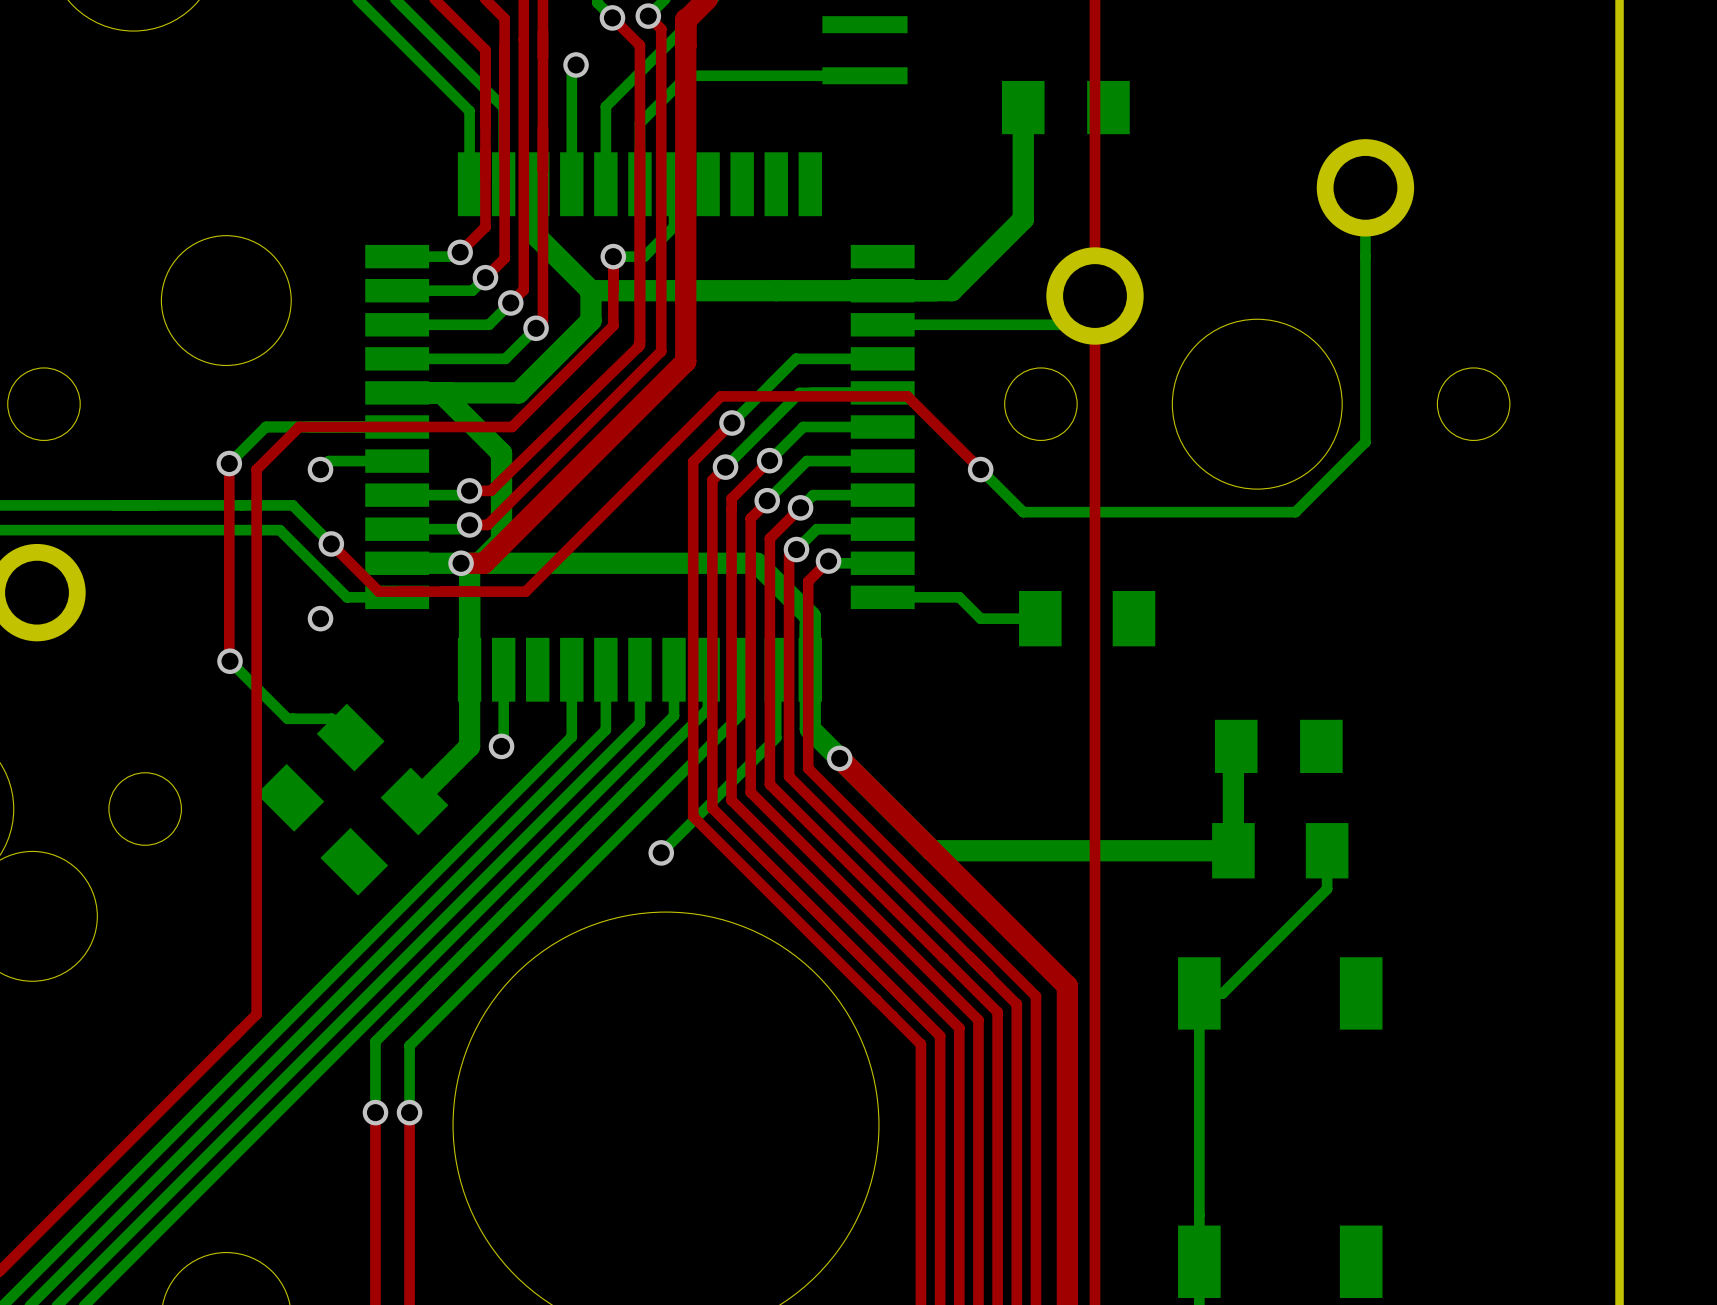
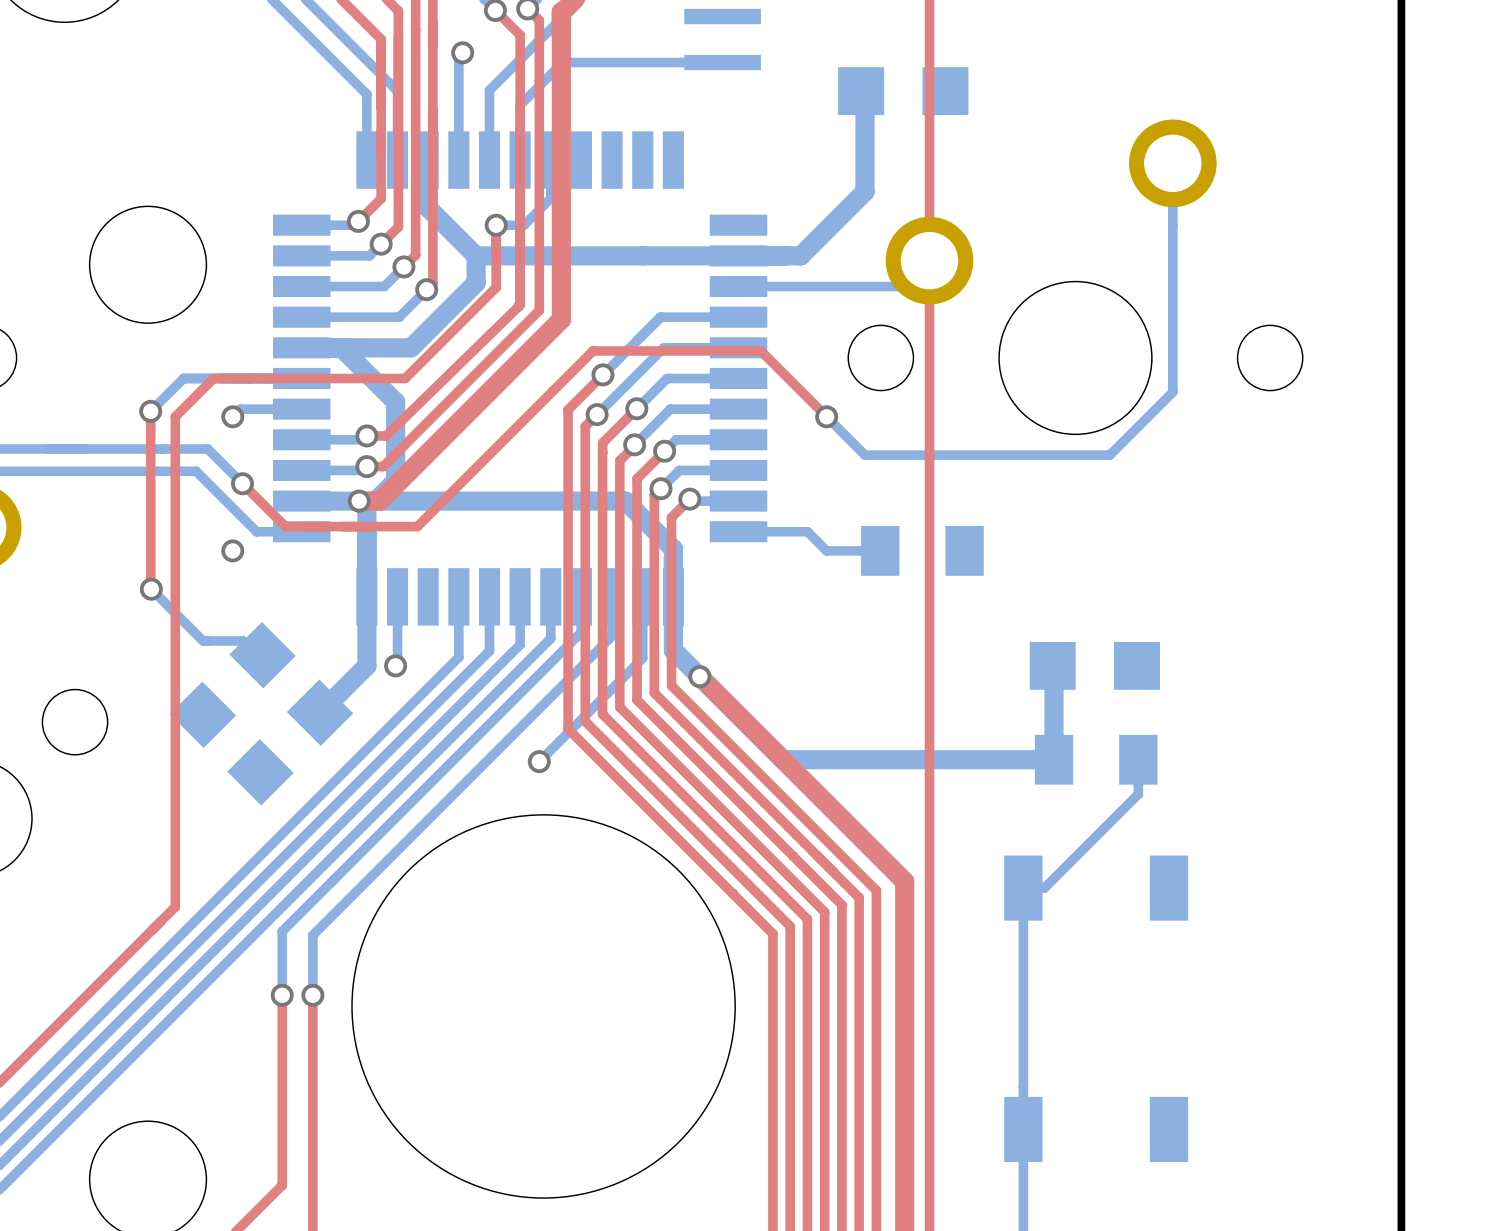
part footprint: [1001, 80, 1130, 135] -> [838, 67, 969, 116]
part footprint: [256, 703, 385, 832] -> [169, 622, 296, 749]
part footprint: [1214, 719, 1343, 774] -> [1029, 641, 1161, 690]
part footprint: [320, 767, 449, 896] -> [227, 679, 354, 806]

